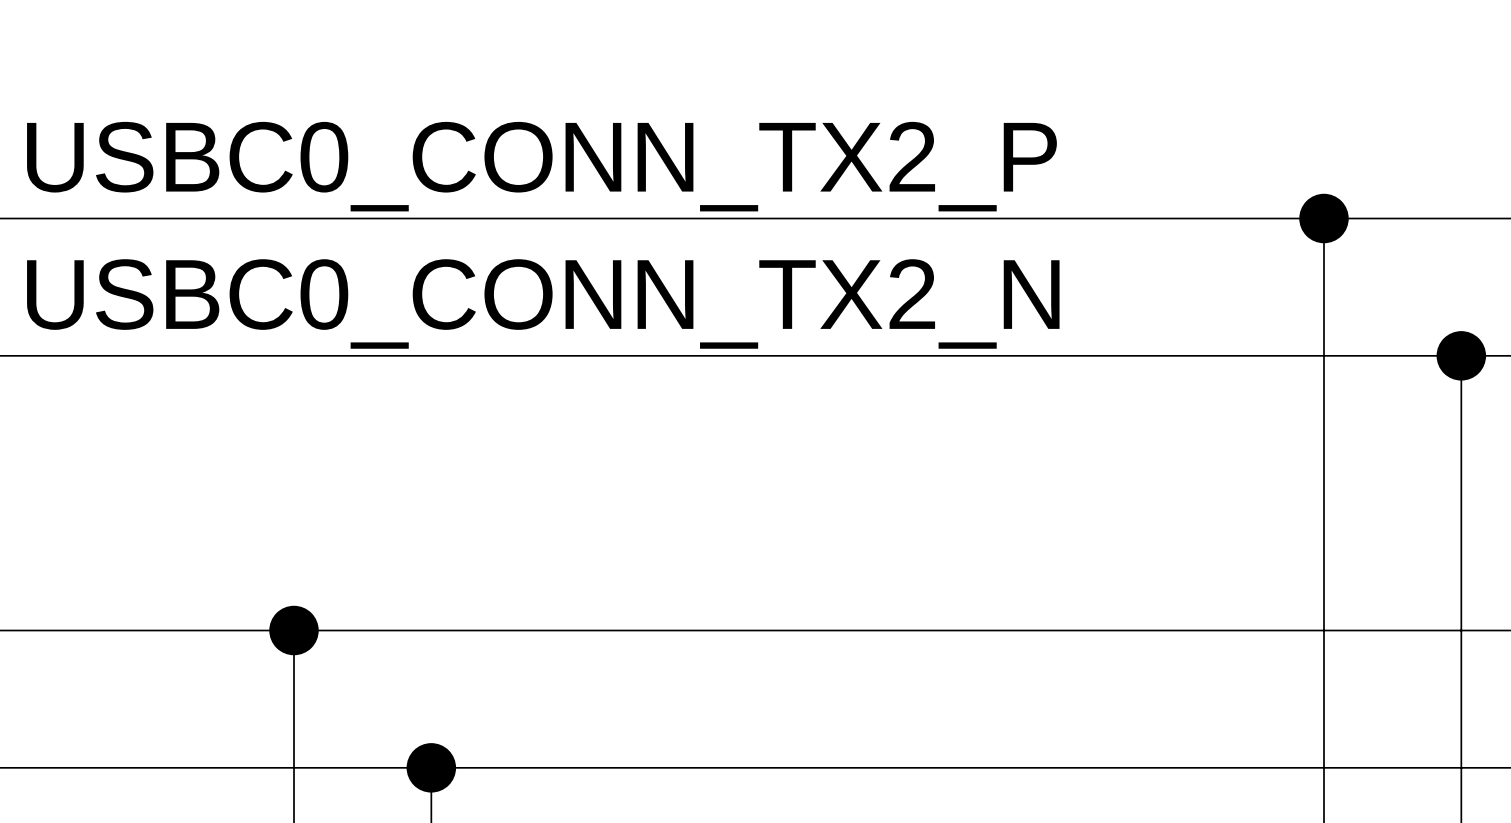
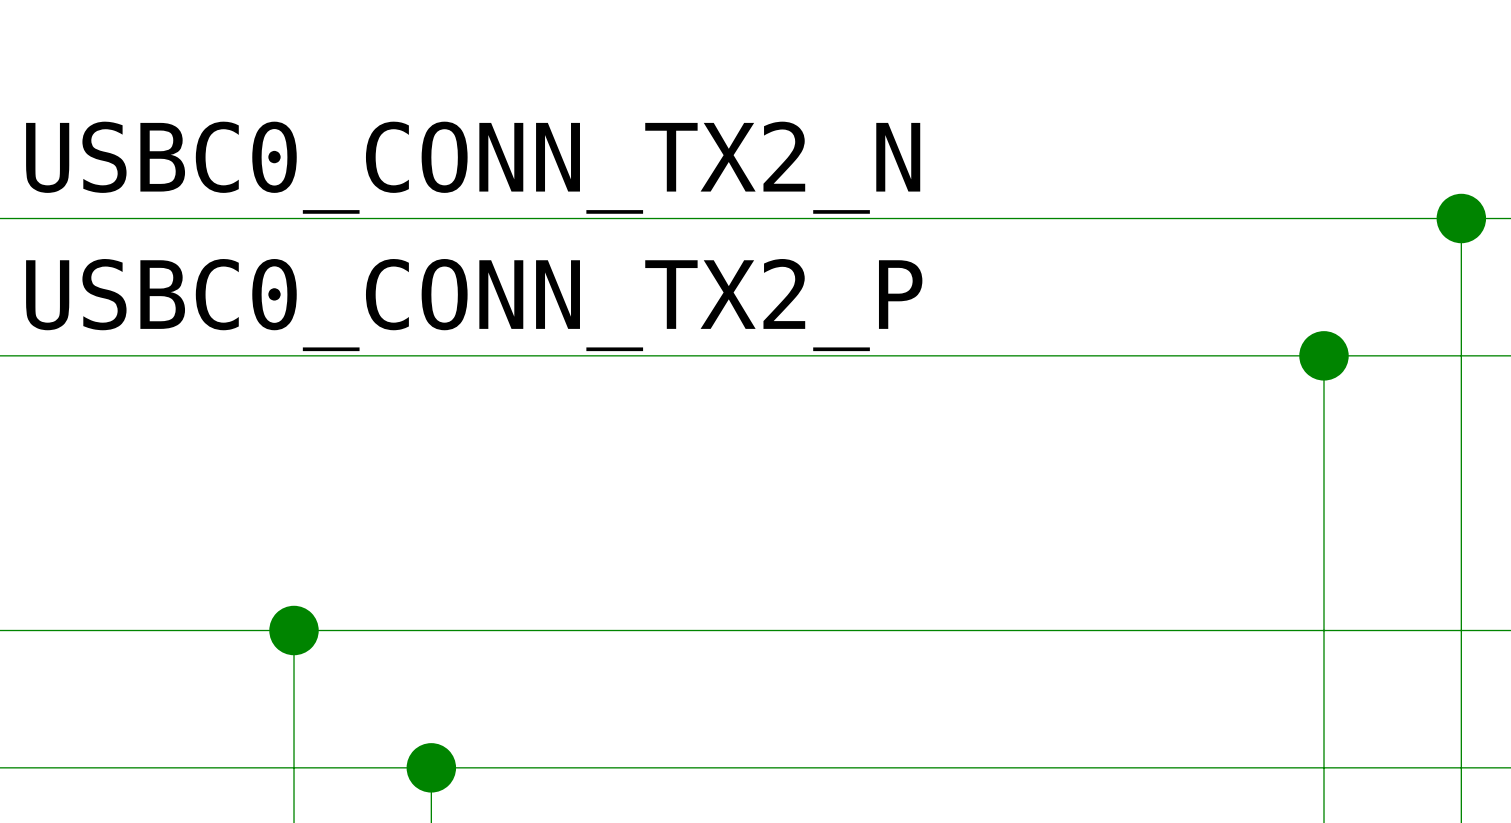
label: USBC0_CONN_TX2_P (541, 166) -> USBC0_CONN_TX2_N (473, 167)
wire: (1323, 218) (1323, 355) -> (1461, 218) (1461, 355)
junction: (1323, 218) -> none
junction: none -> (1461, 218)
label: USBC0_CONN_TX2_N (543, 303) -> USBC0_CONN_TX2_P (474, 305)
junction: none -> (1323, 355)
junction: (1461, 355) -> none

